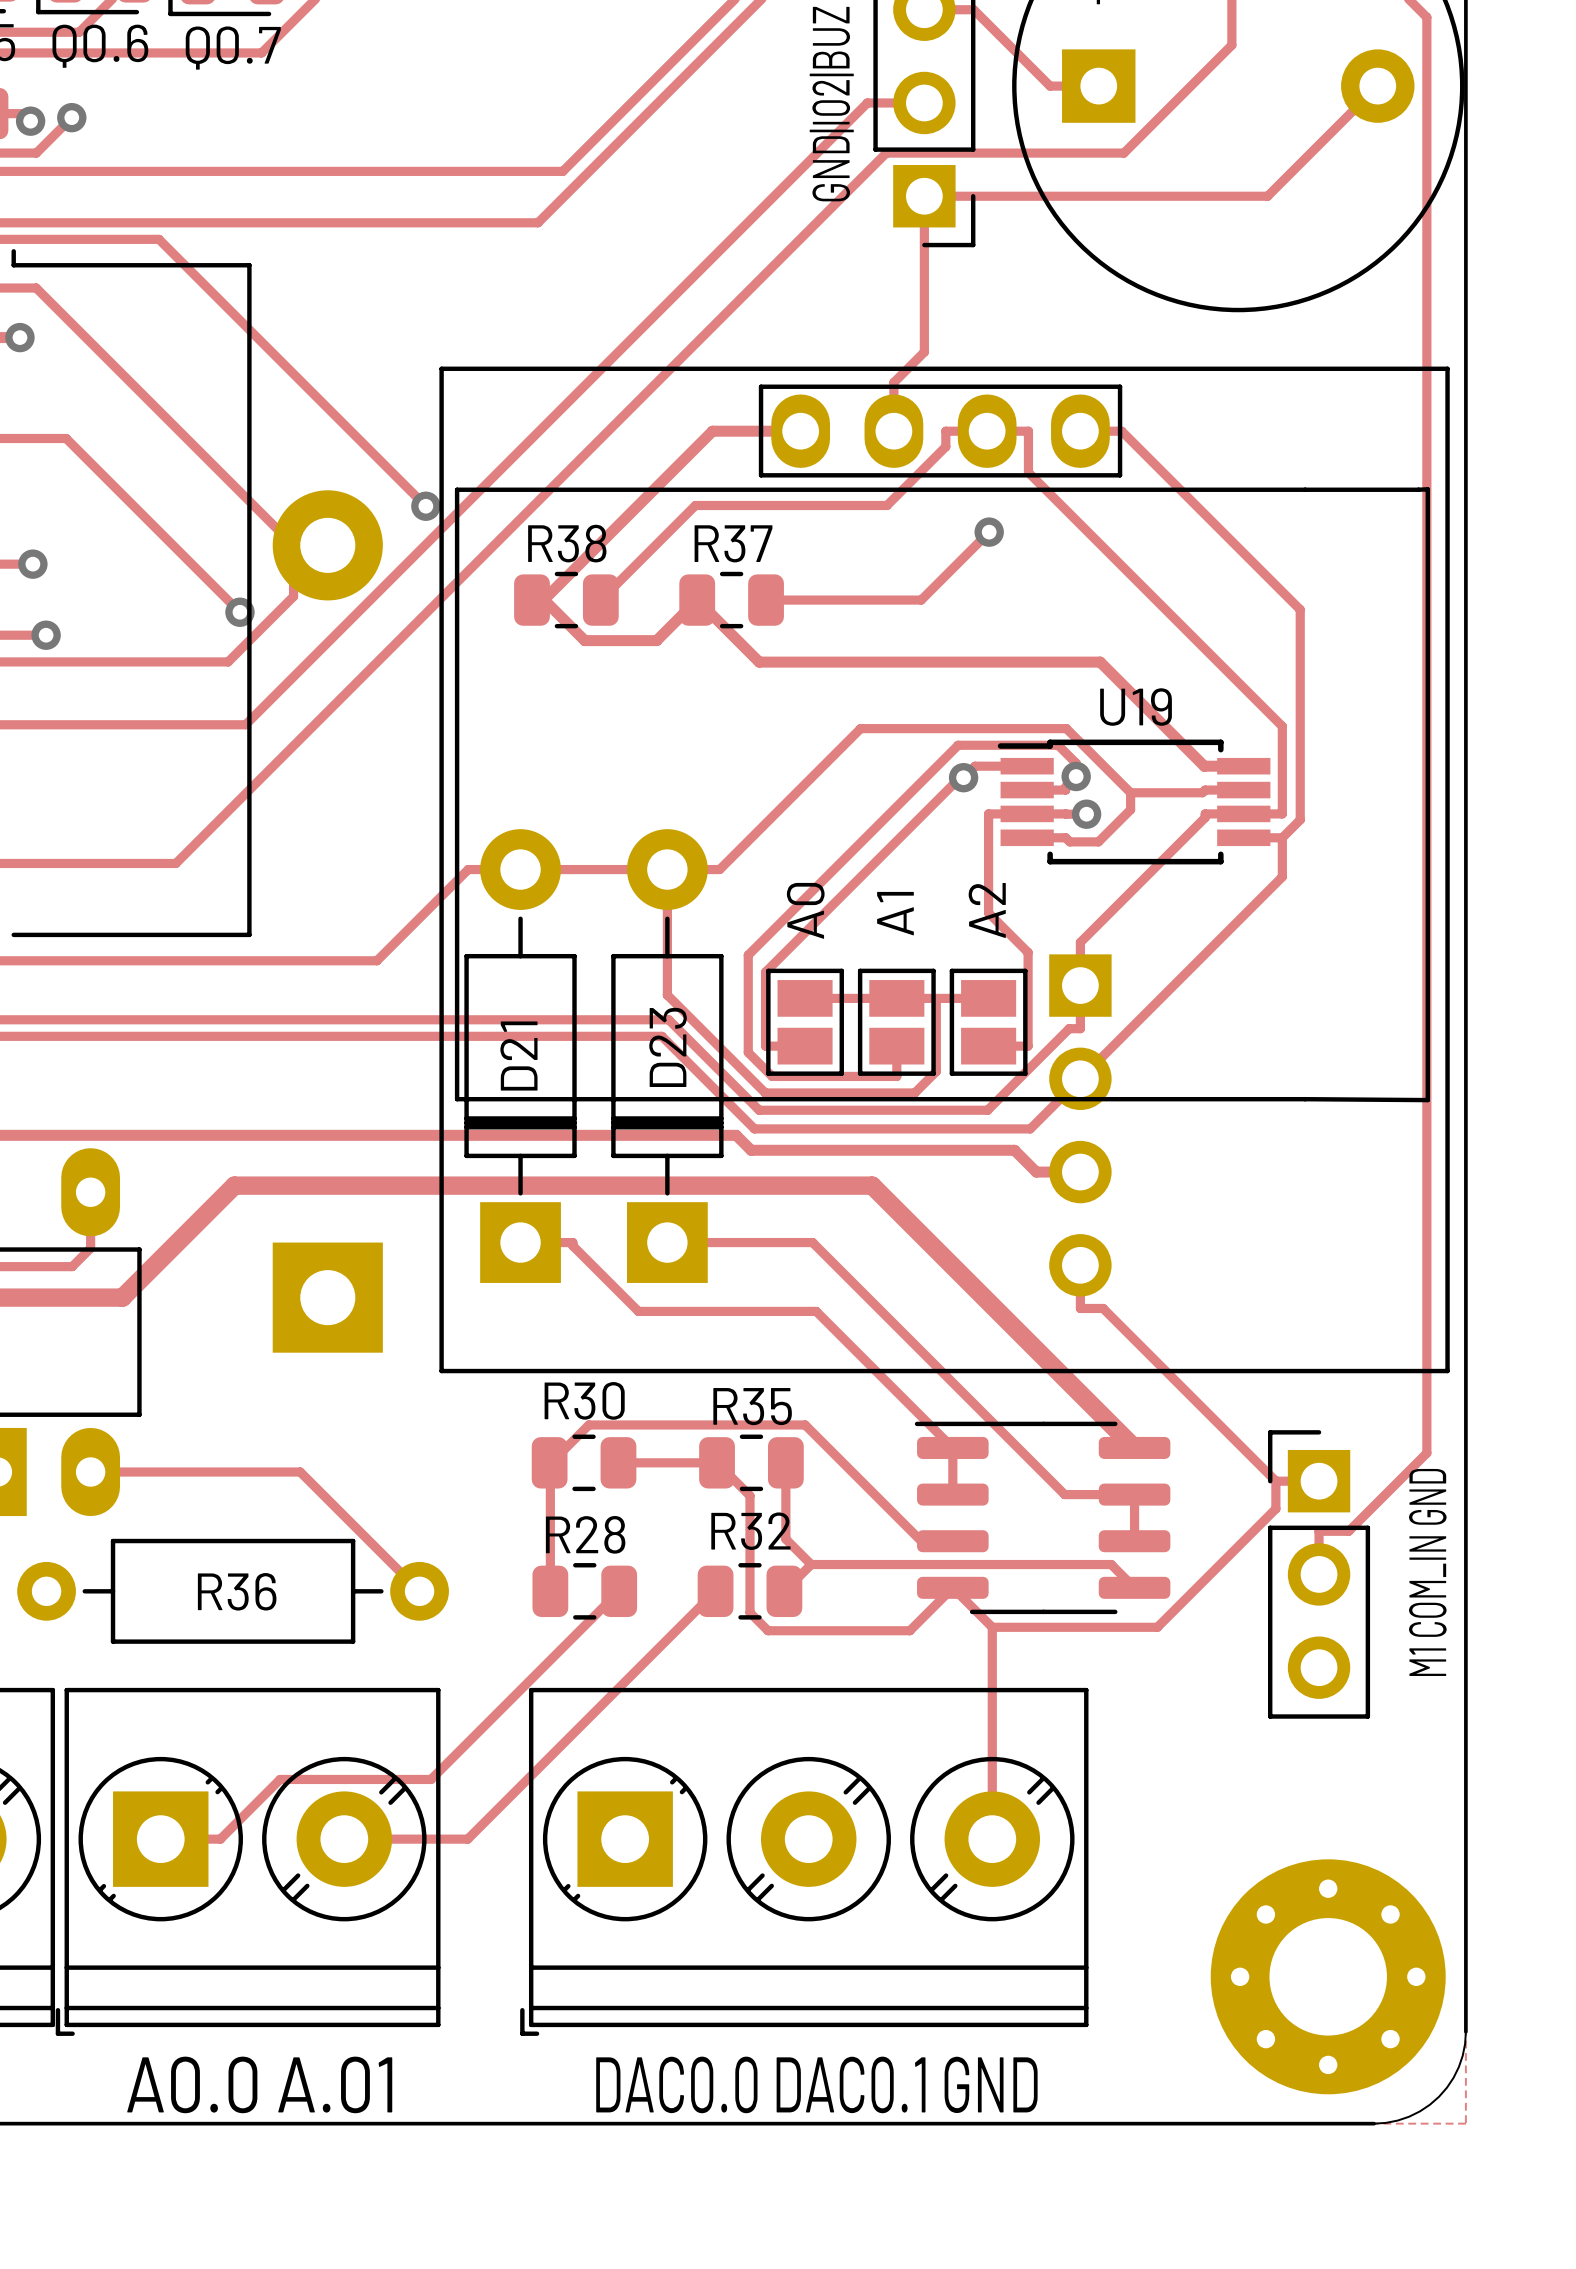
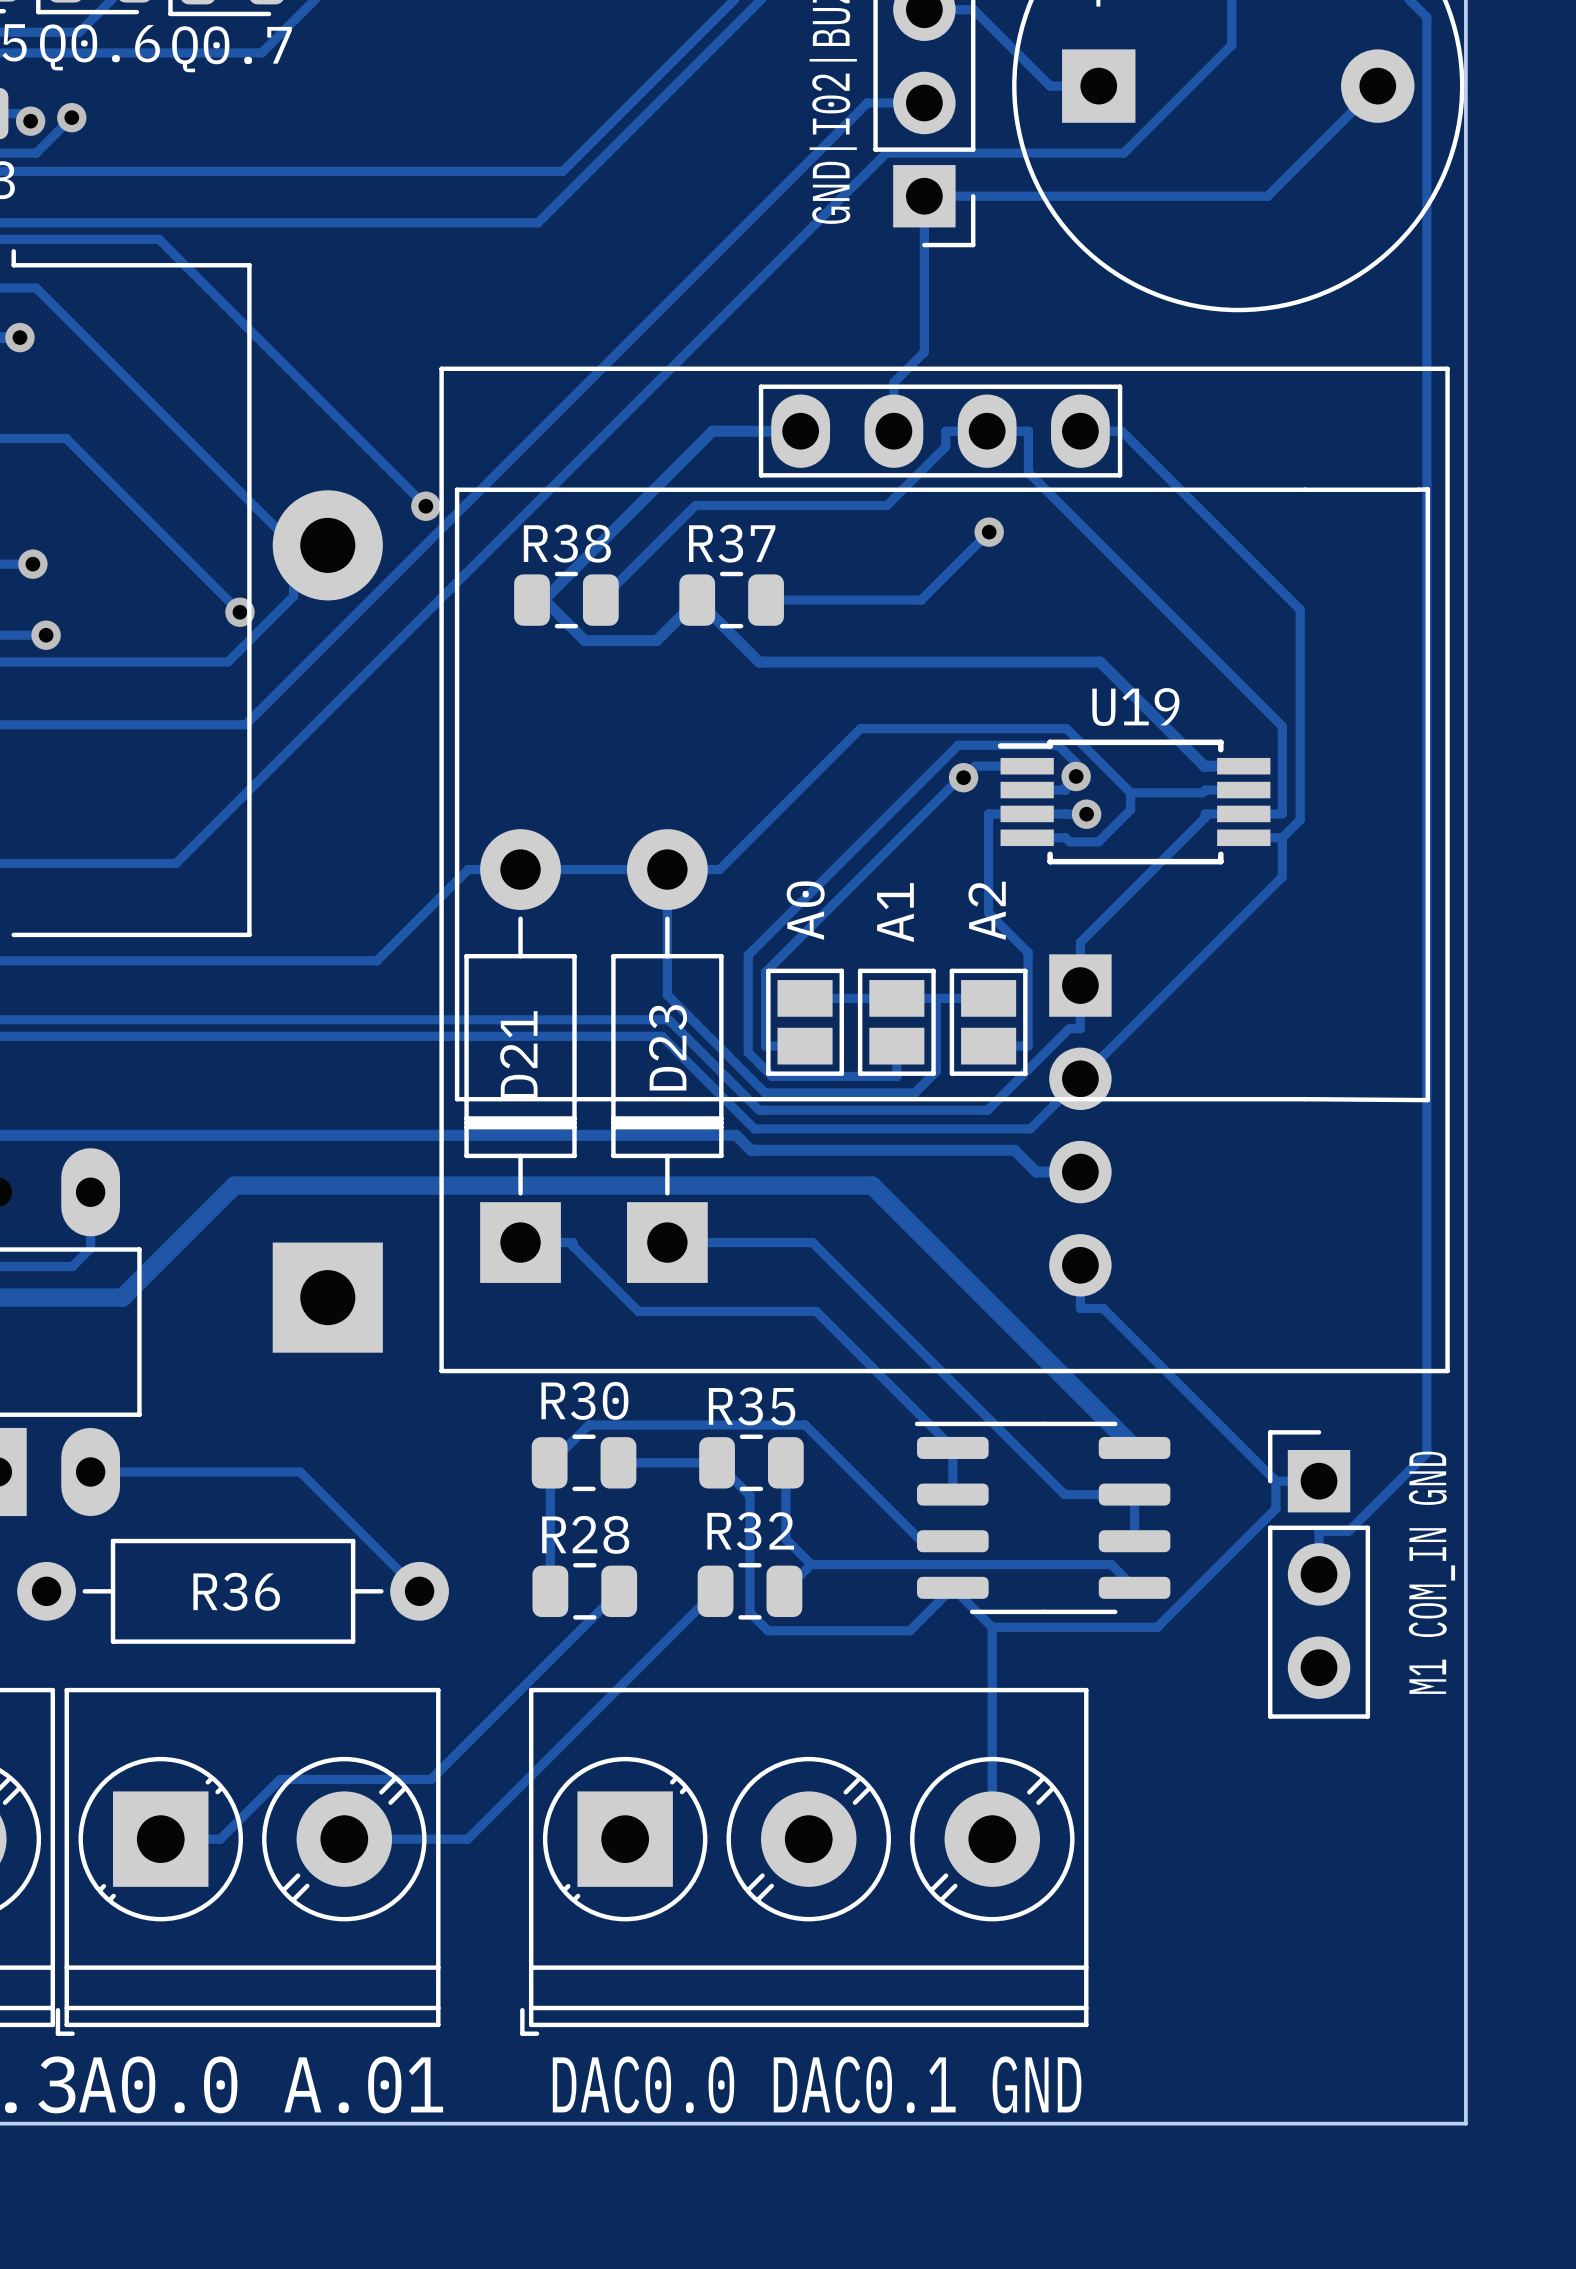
part: (1328, 1976) -> none
board edge: (1465, 2031) (1465, 2043) (1458, 2067) (1453, 2077) (1439, 2096) (1420, 2111) (1409, 2116) (1386, 2122) (1374, 2123) -> (1465, 2031) (1465, 2123) (1374, 2123)

